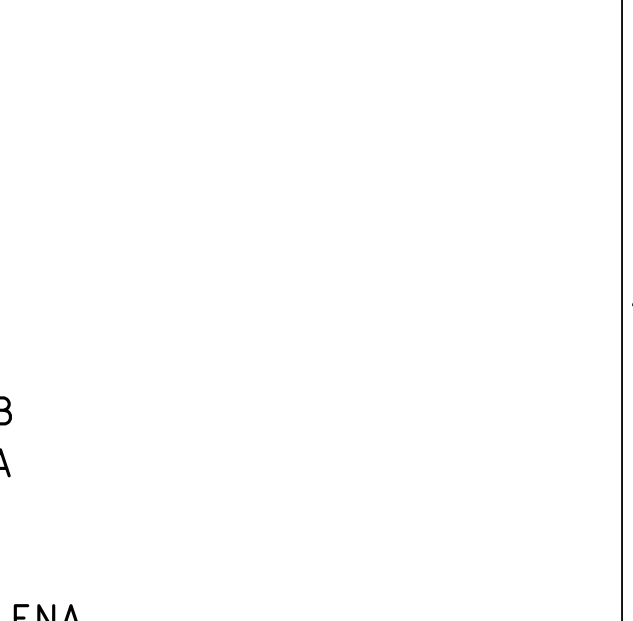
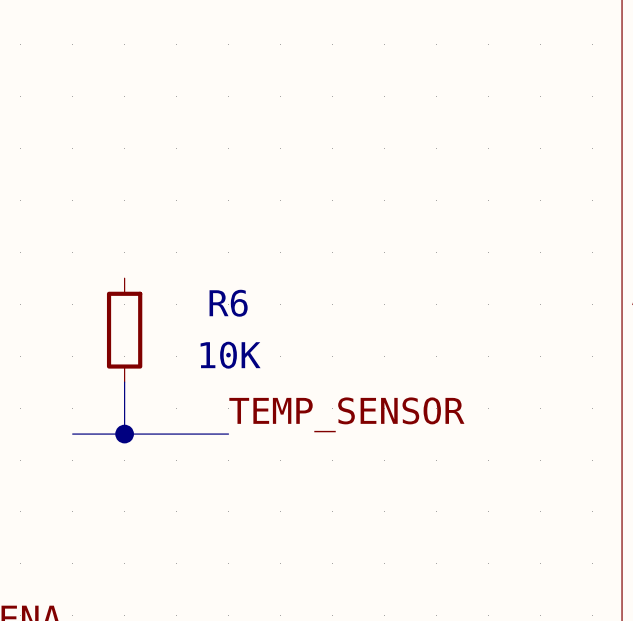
R6: none -> 10K (124, 330)
wire: none -> (124, 382) (124, 434)
label: none -> TEMP_SENSOR (346, 414)
wire: none -> (72, 434) (228, 434)
junction: none -> (124, 434)

